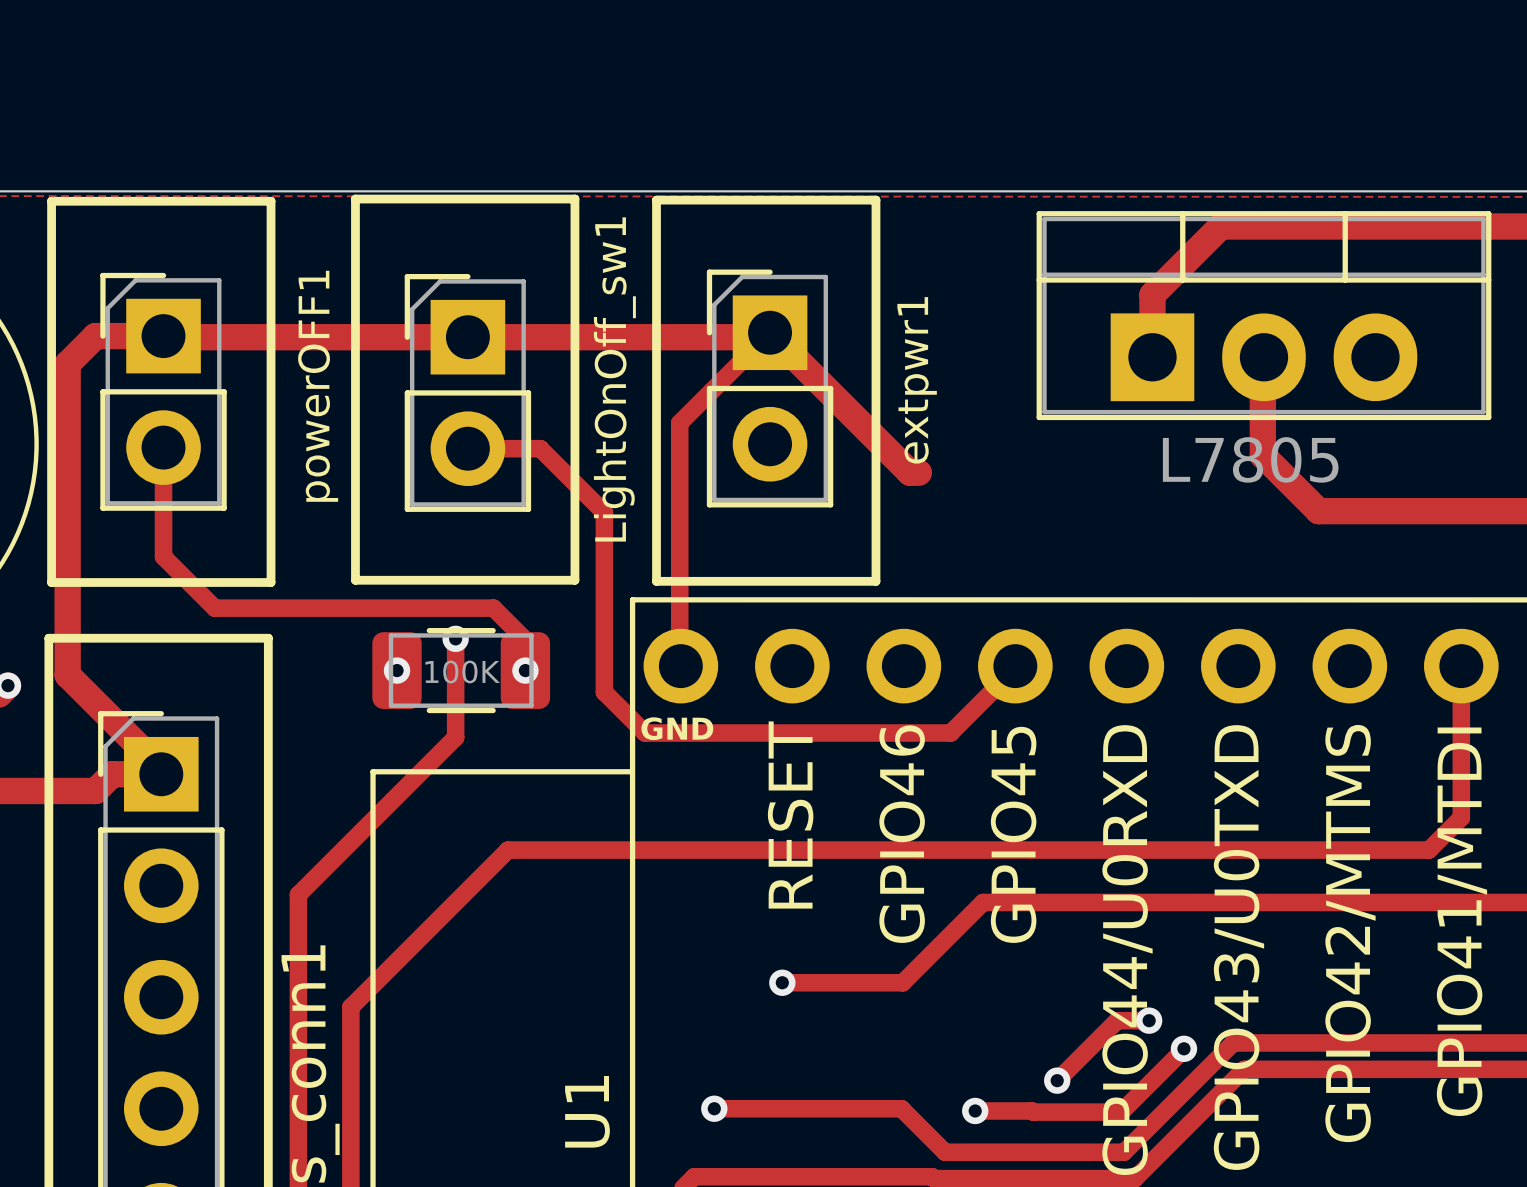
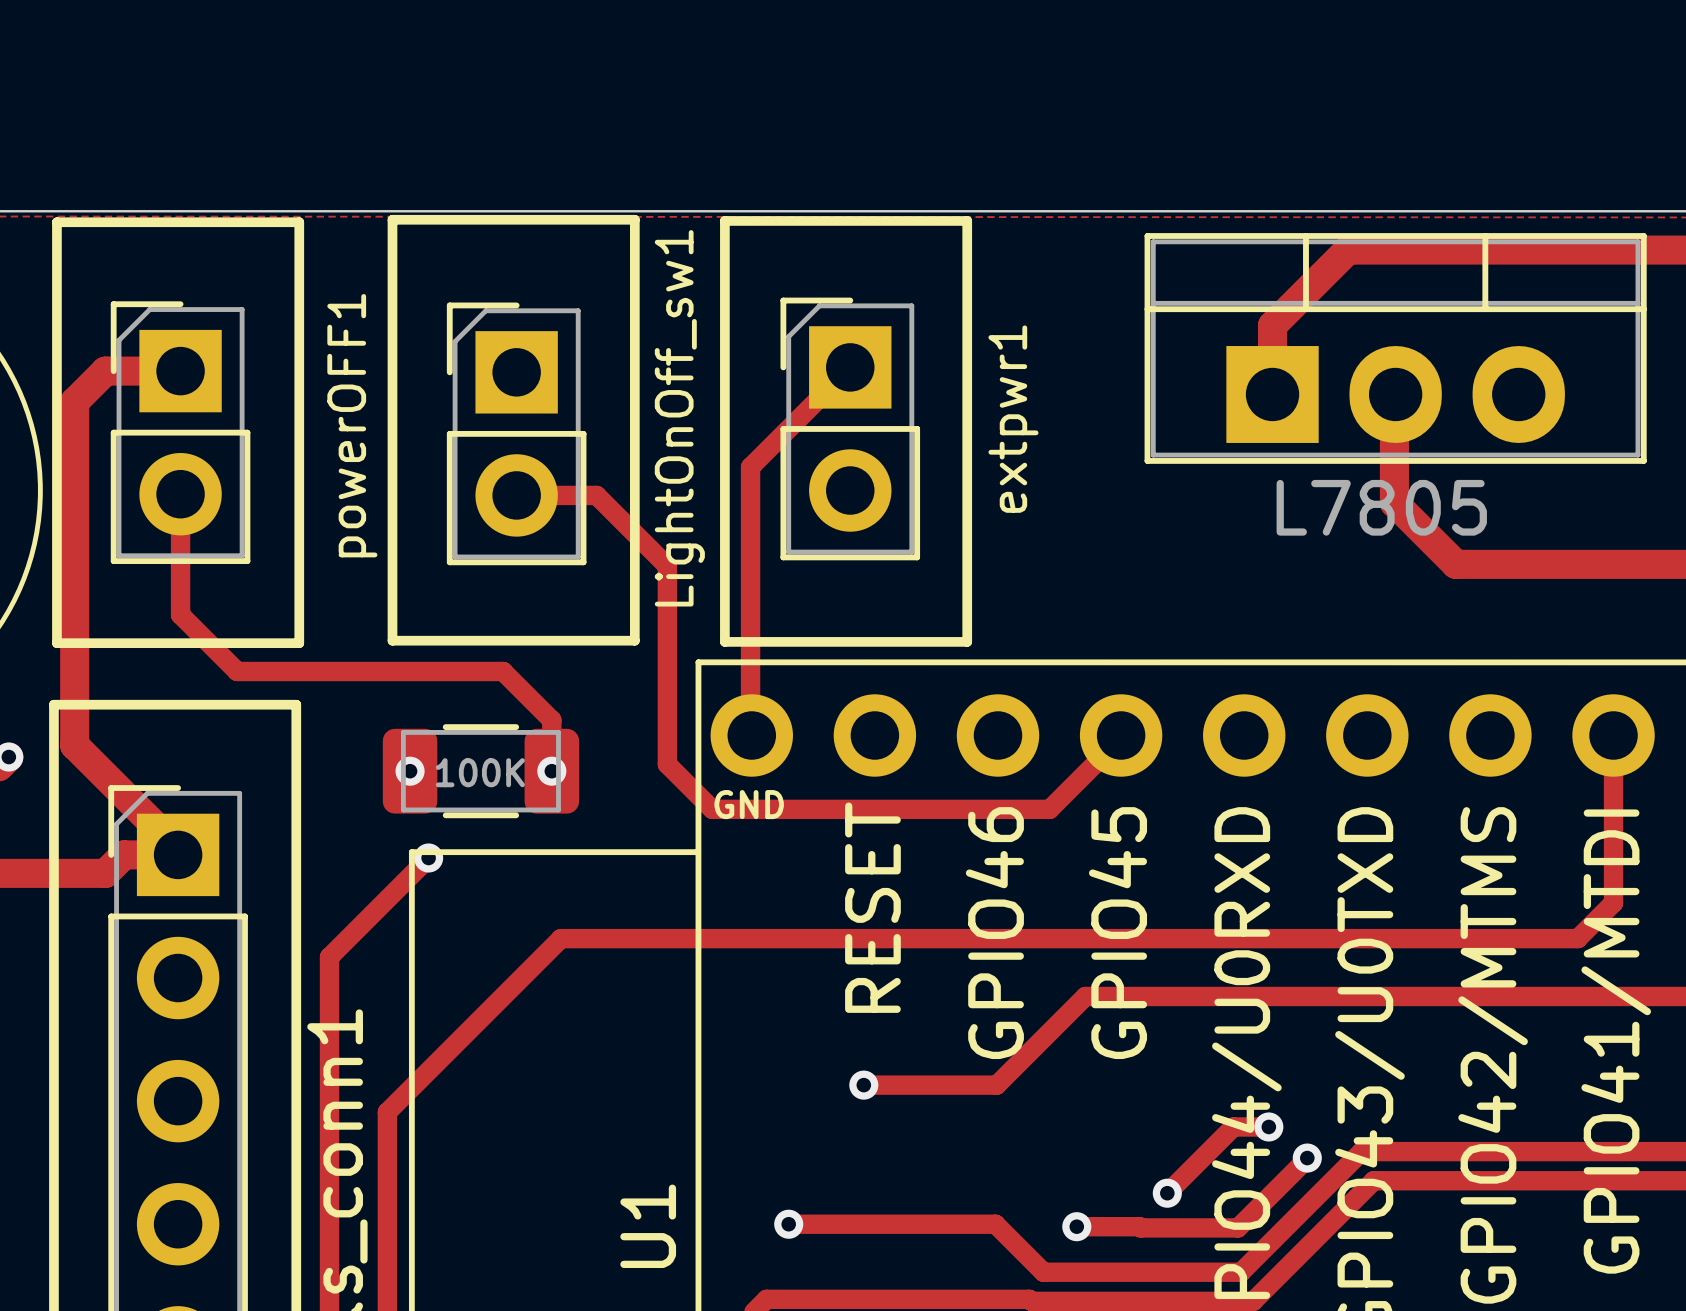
track: (163, 336) (774, 337) (910, 472) (918, 472) -> none
track: (455, 608) (493, 608) (525, 640) (525, 670) -> (503, 671) (551, 720) (551, 771)
track: (455, 638) (455, 737) (298, 894) -> (428, 857) (329, 957) (329, 987)
via: (455, 638) -> none
via position: (397, 670) -> (410, 771)
part position: (461, 670) -> (480, 771)
via: (525, 670) -> none
via: none -> (551, 771)
via: none -> (428, 857)

